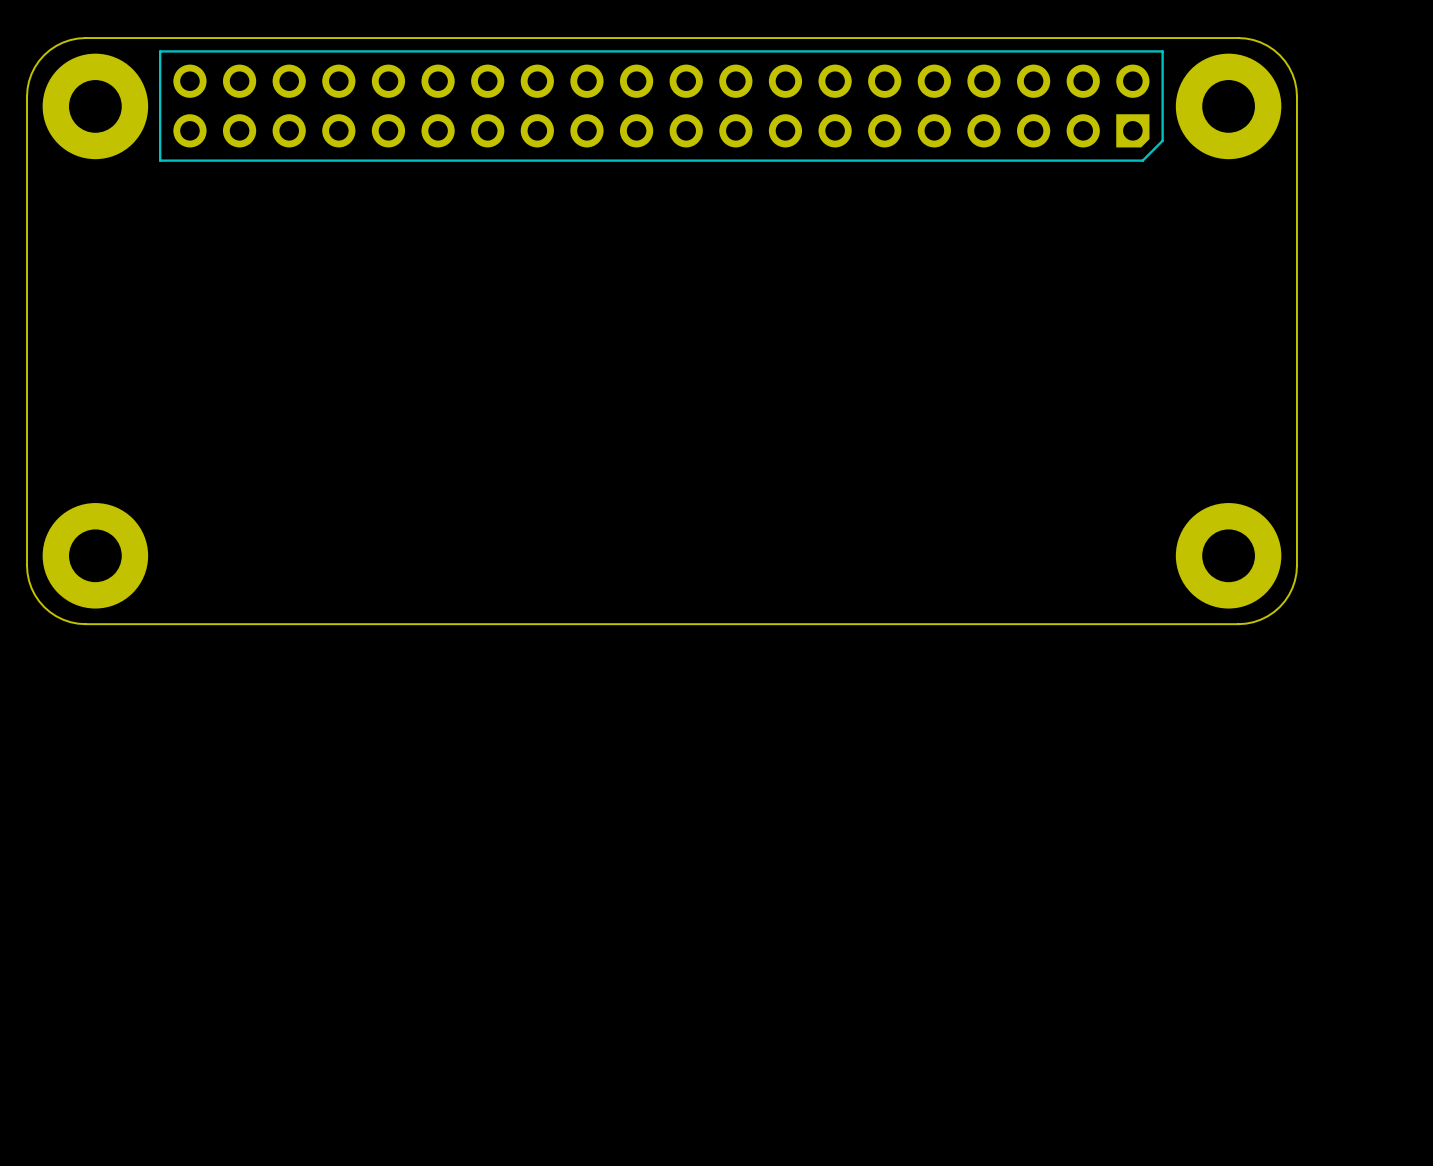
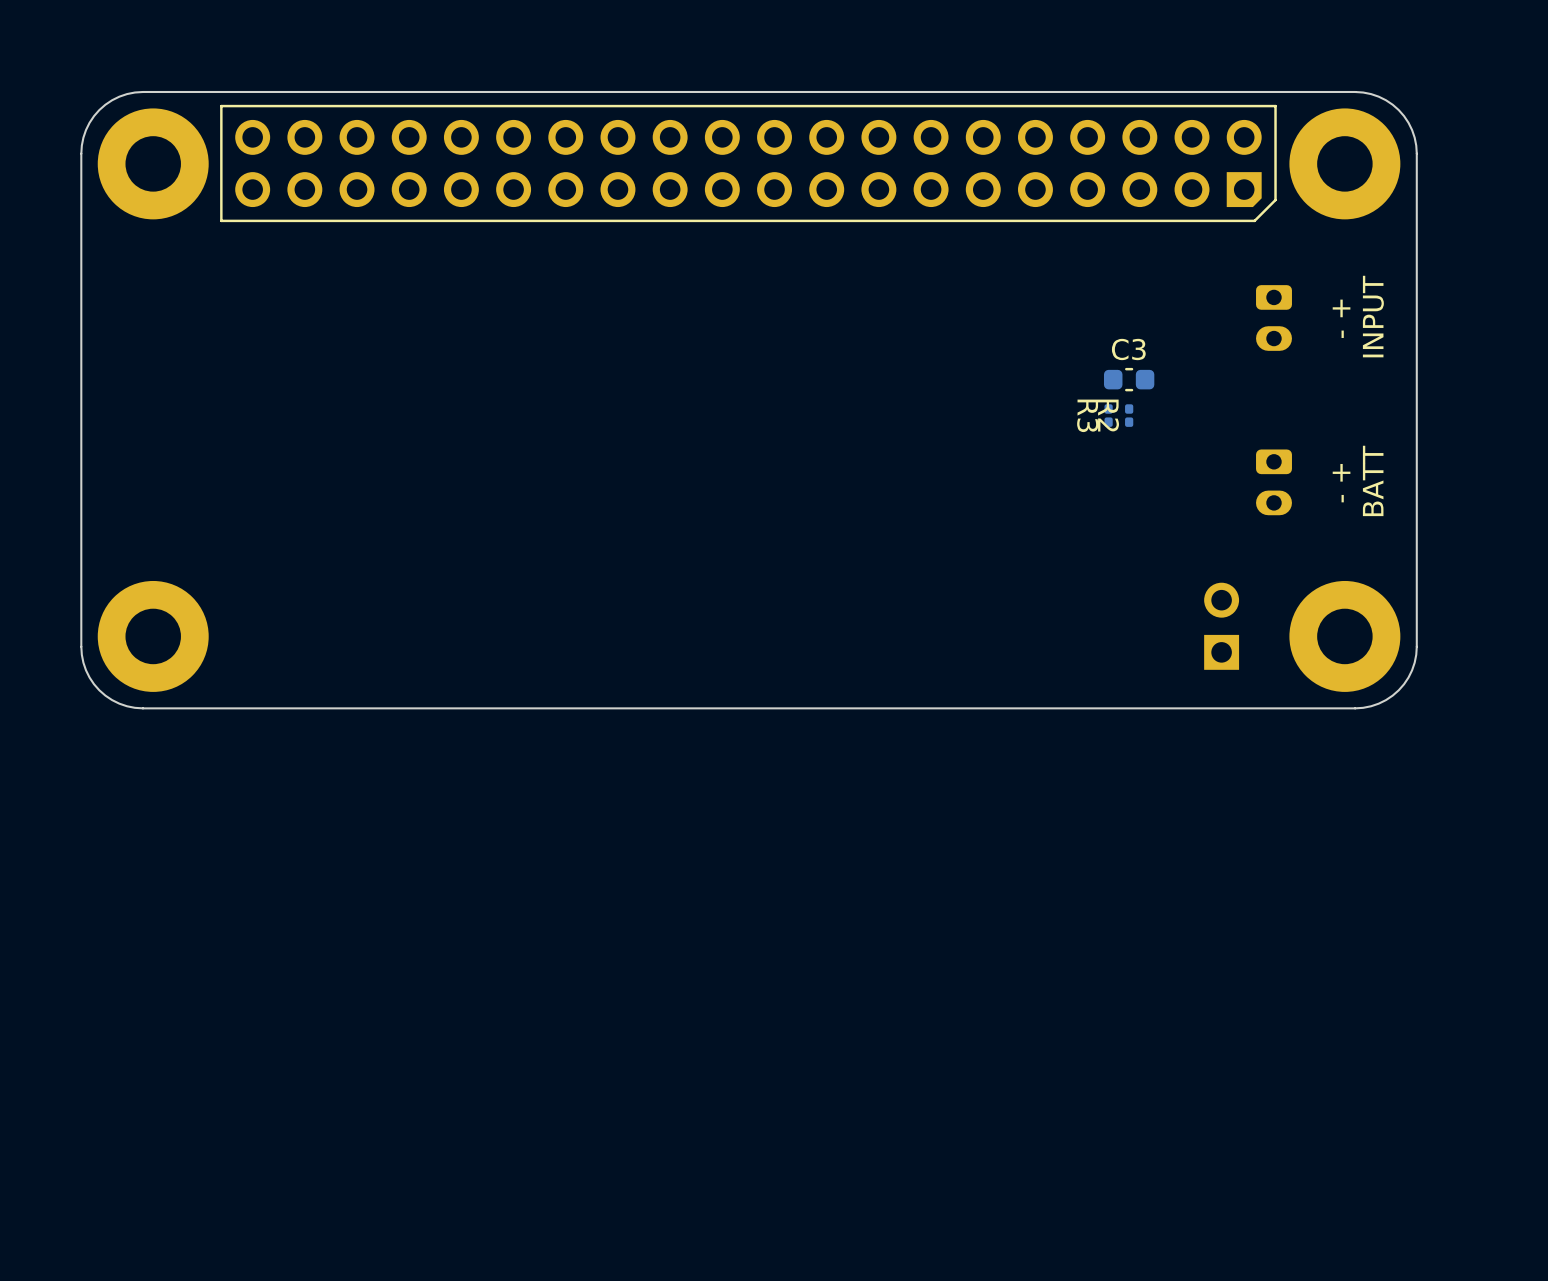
text: none -> INPUT (1373, 316)
part: none -> (1274, 317)
text: none -> - + (1341, 318)
C3: none -> (1129, 379)
R3: none -> (1108, 415)
R2: none -> (1129, 415)
text: none -> BATT (1373, 480)
part: none -> (1274, 482)
text: none -> - + (1341, 483)
part: none -> (1221, 626)

